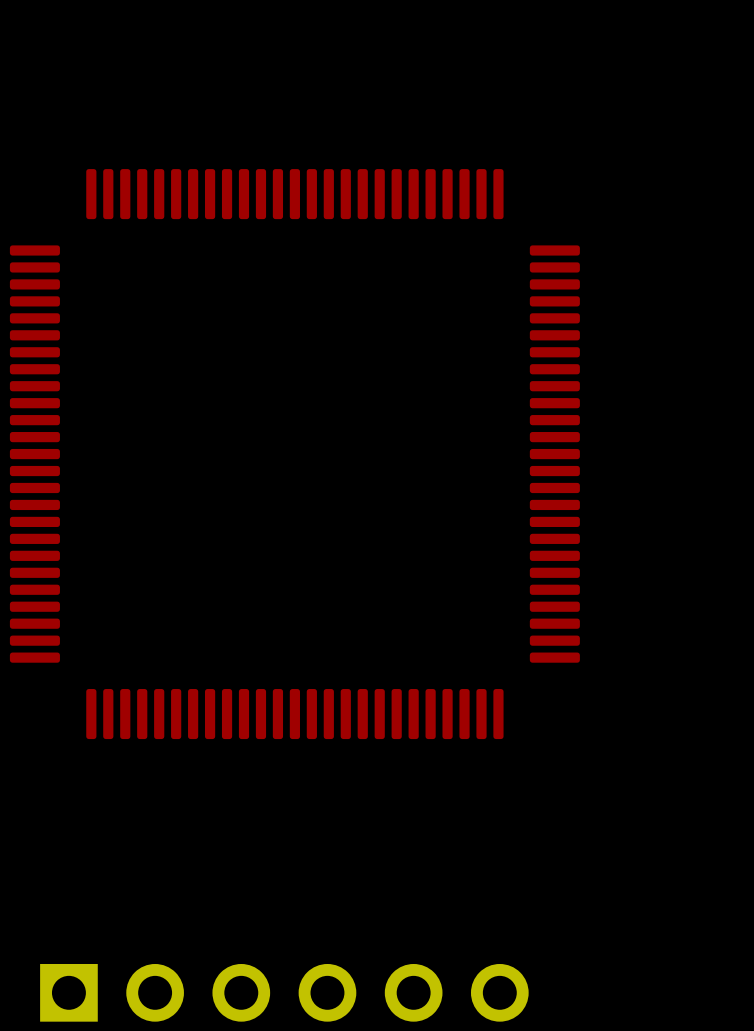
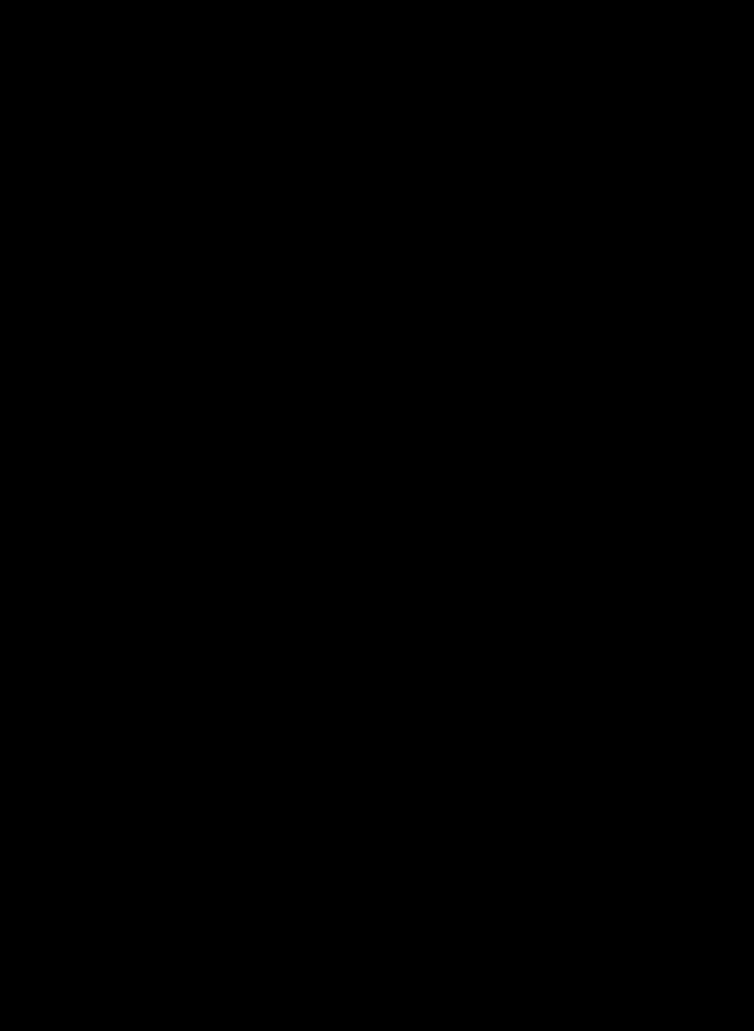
part: (294, 454) -> none
part: (284, 992) -> none

